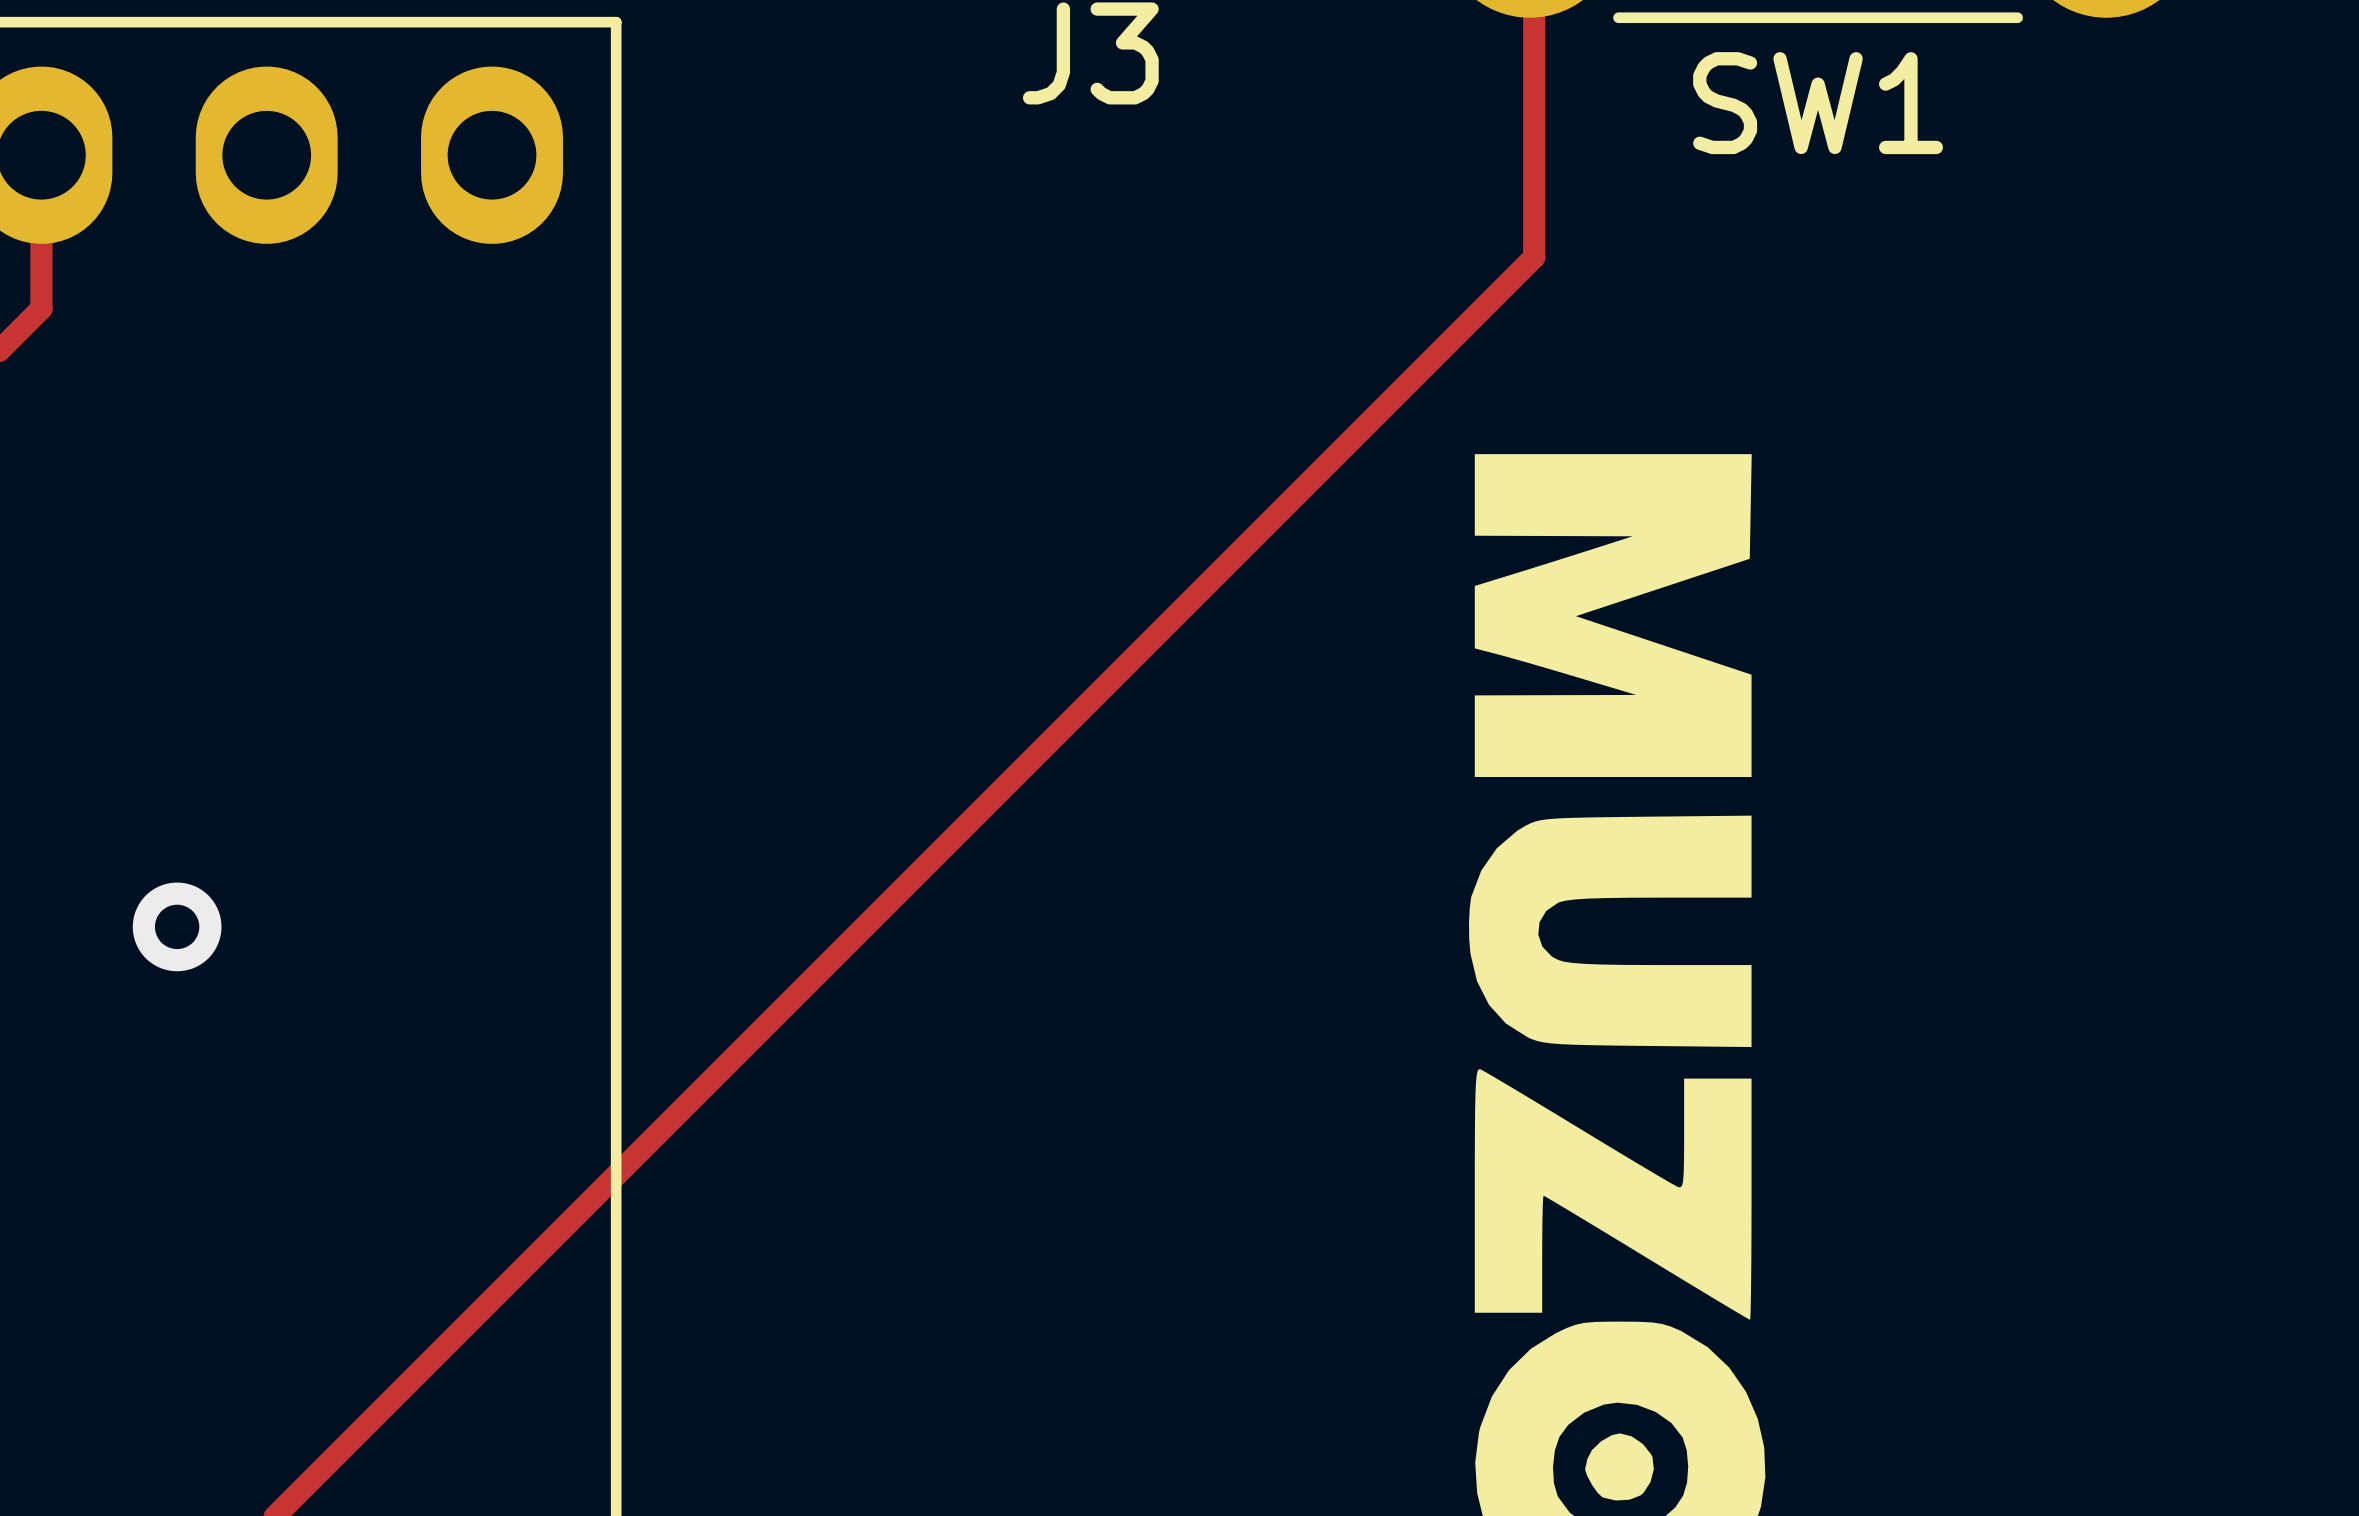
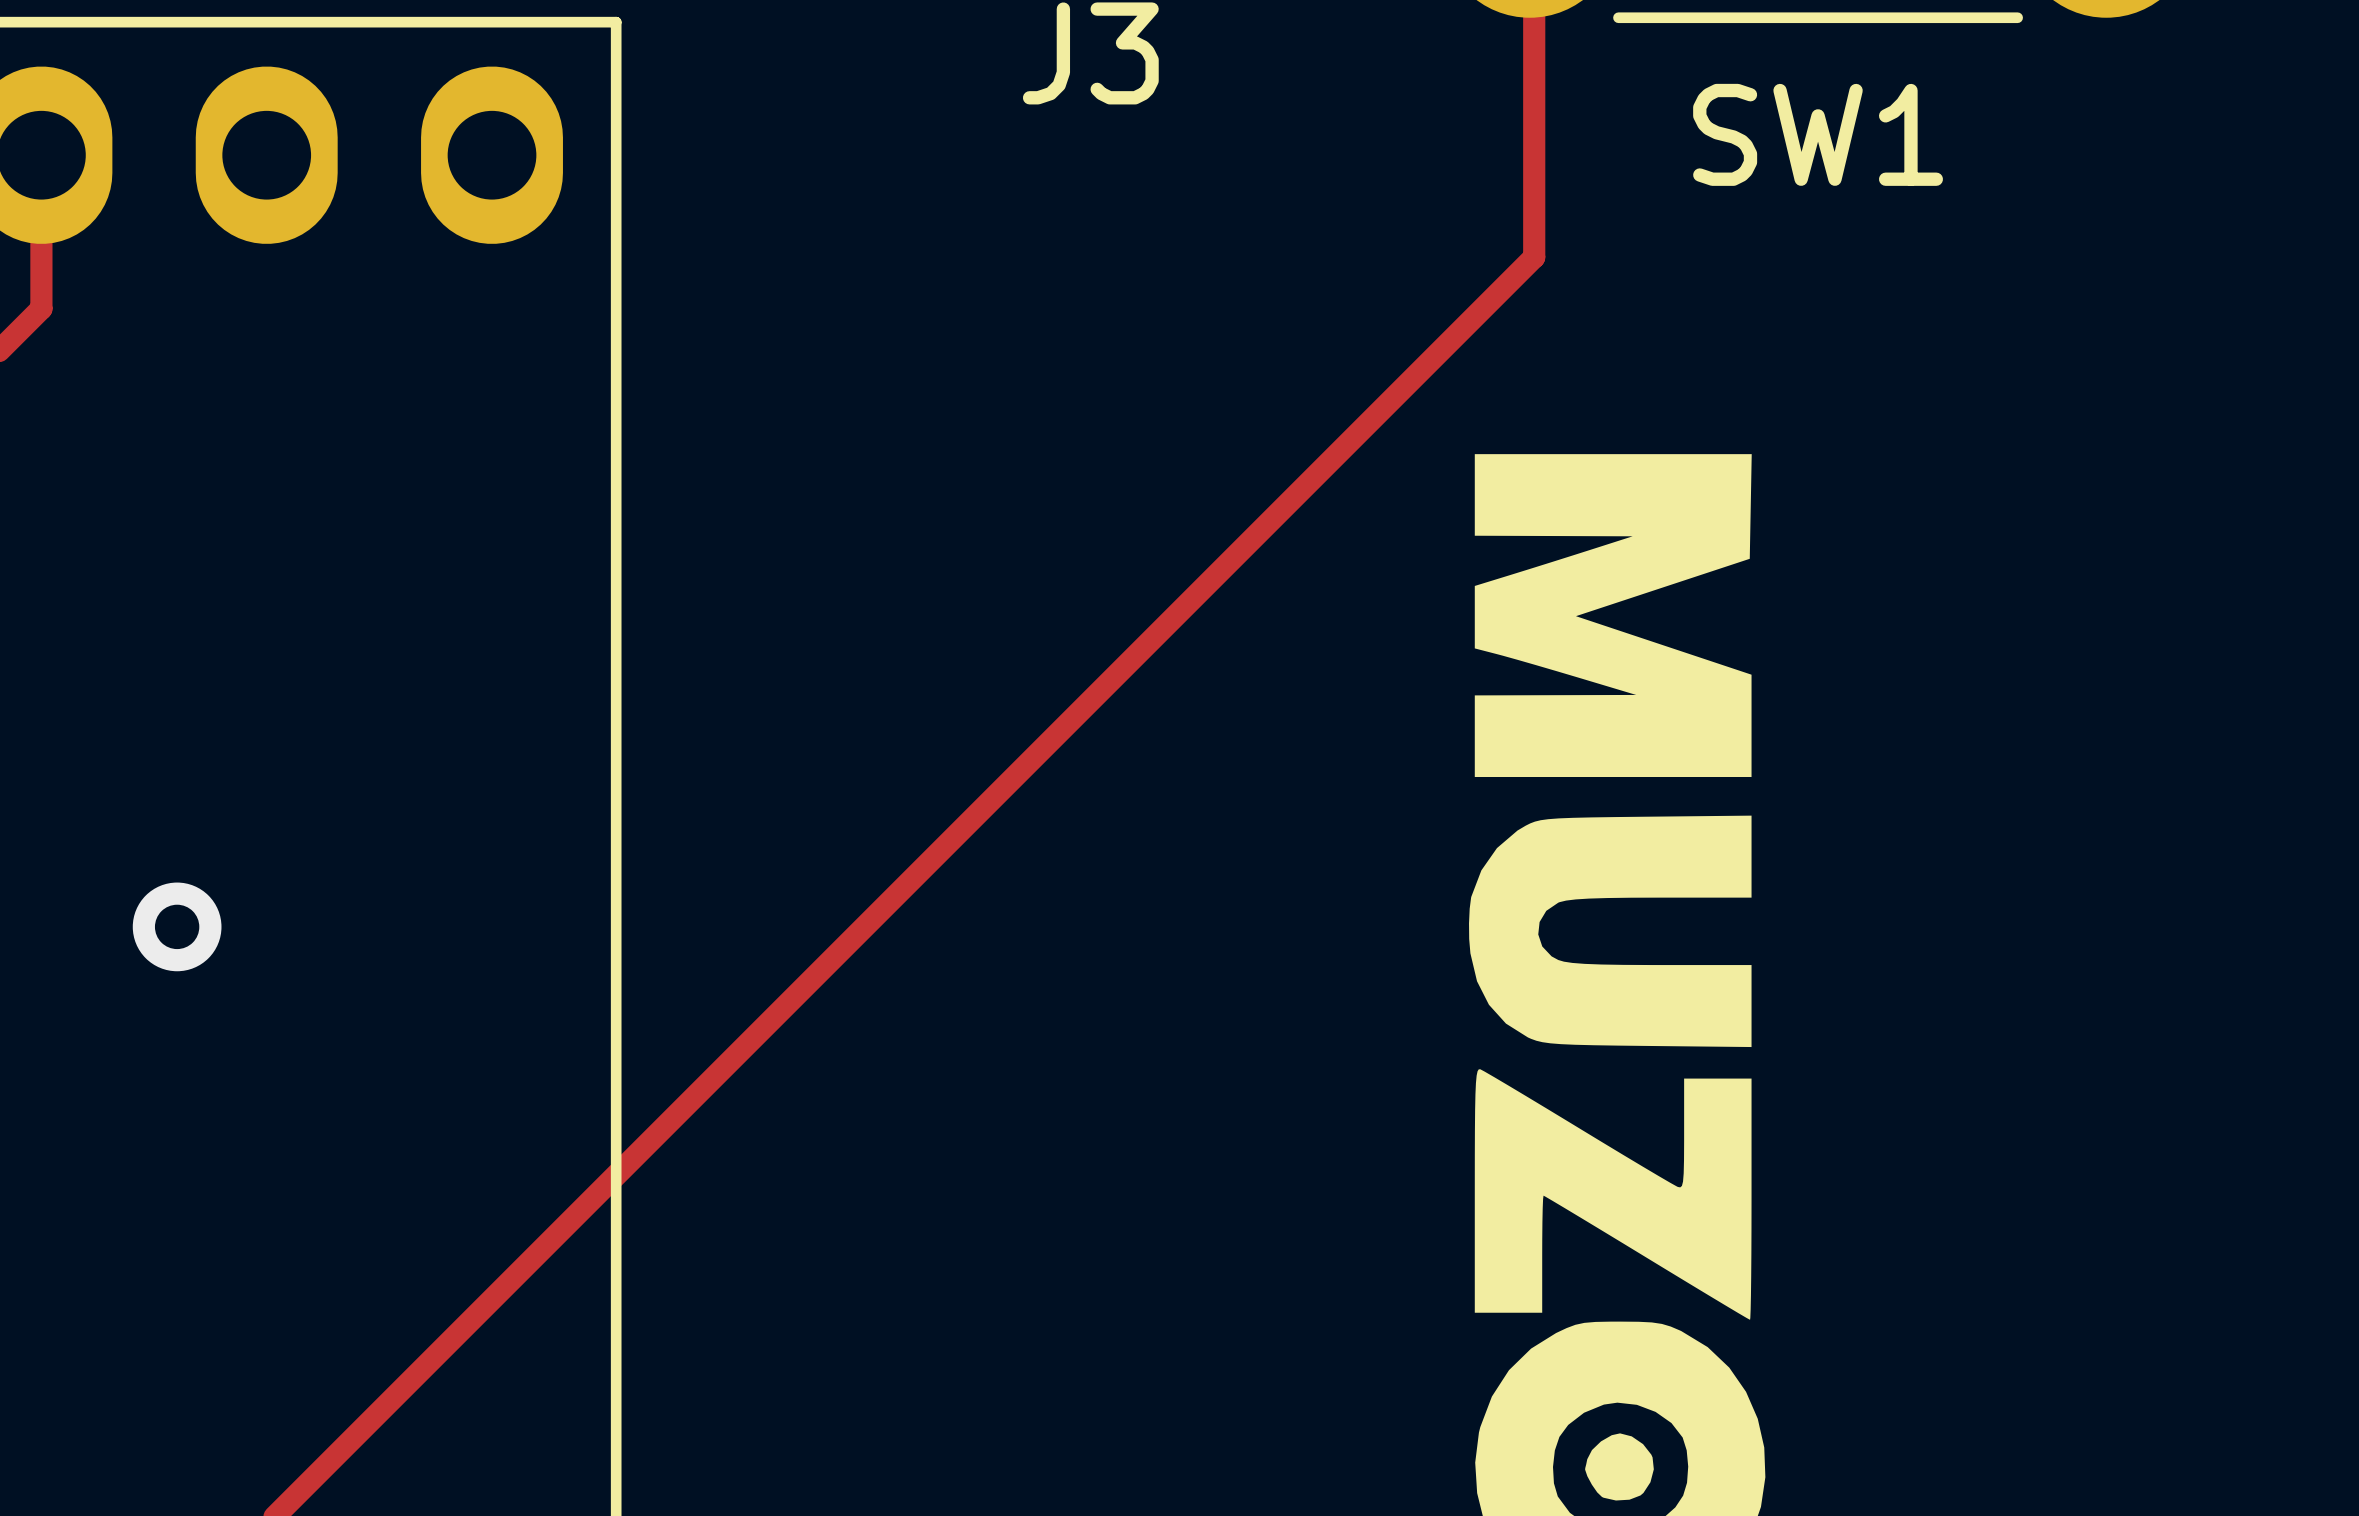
SW1 name position: SW1 (1818, 103) -> SW1 (1818, 134)

